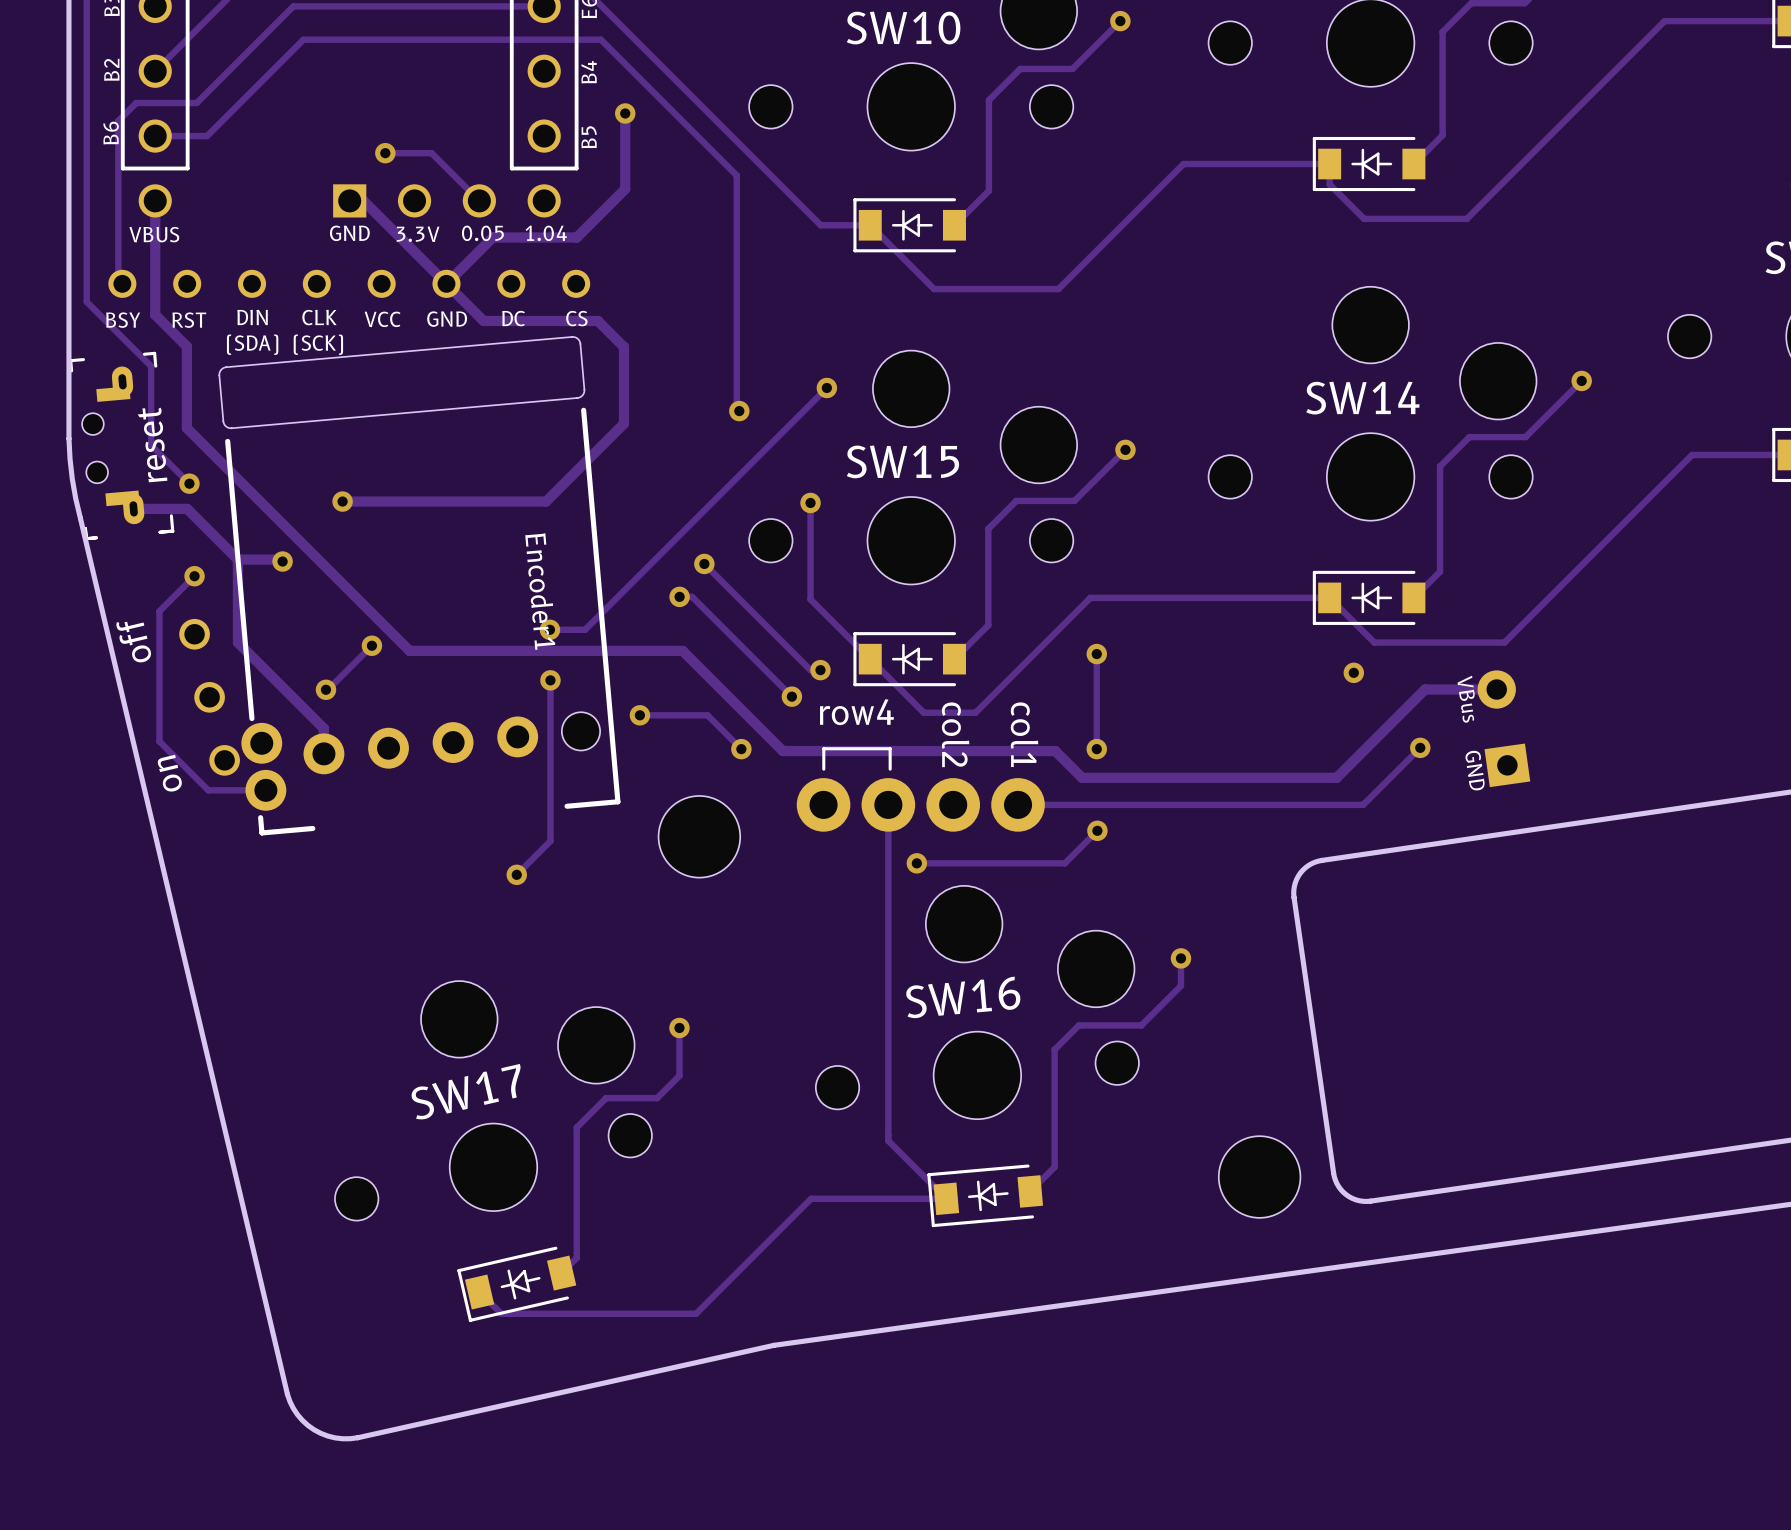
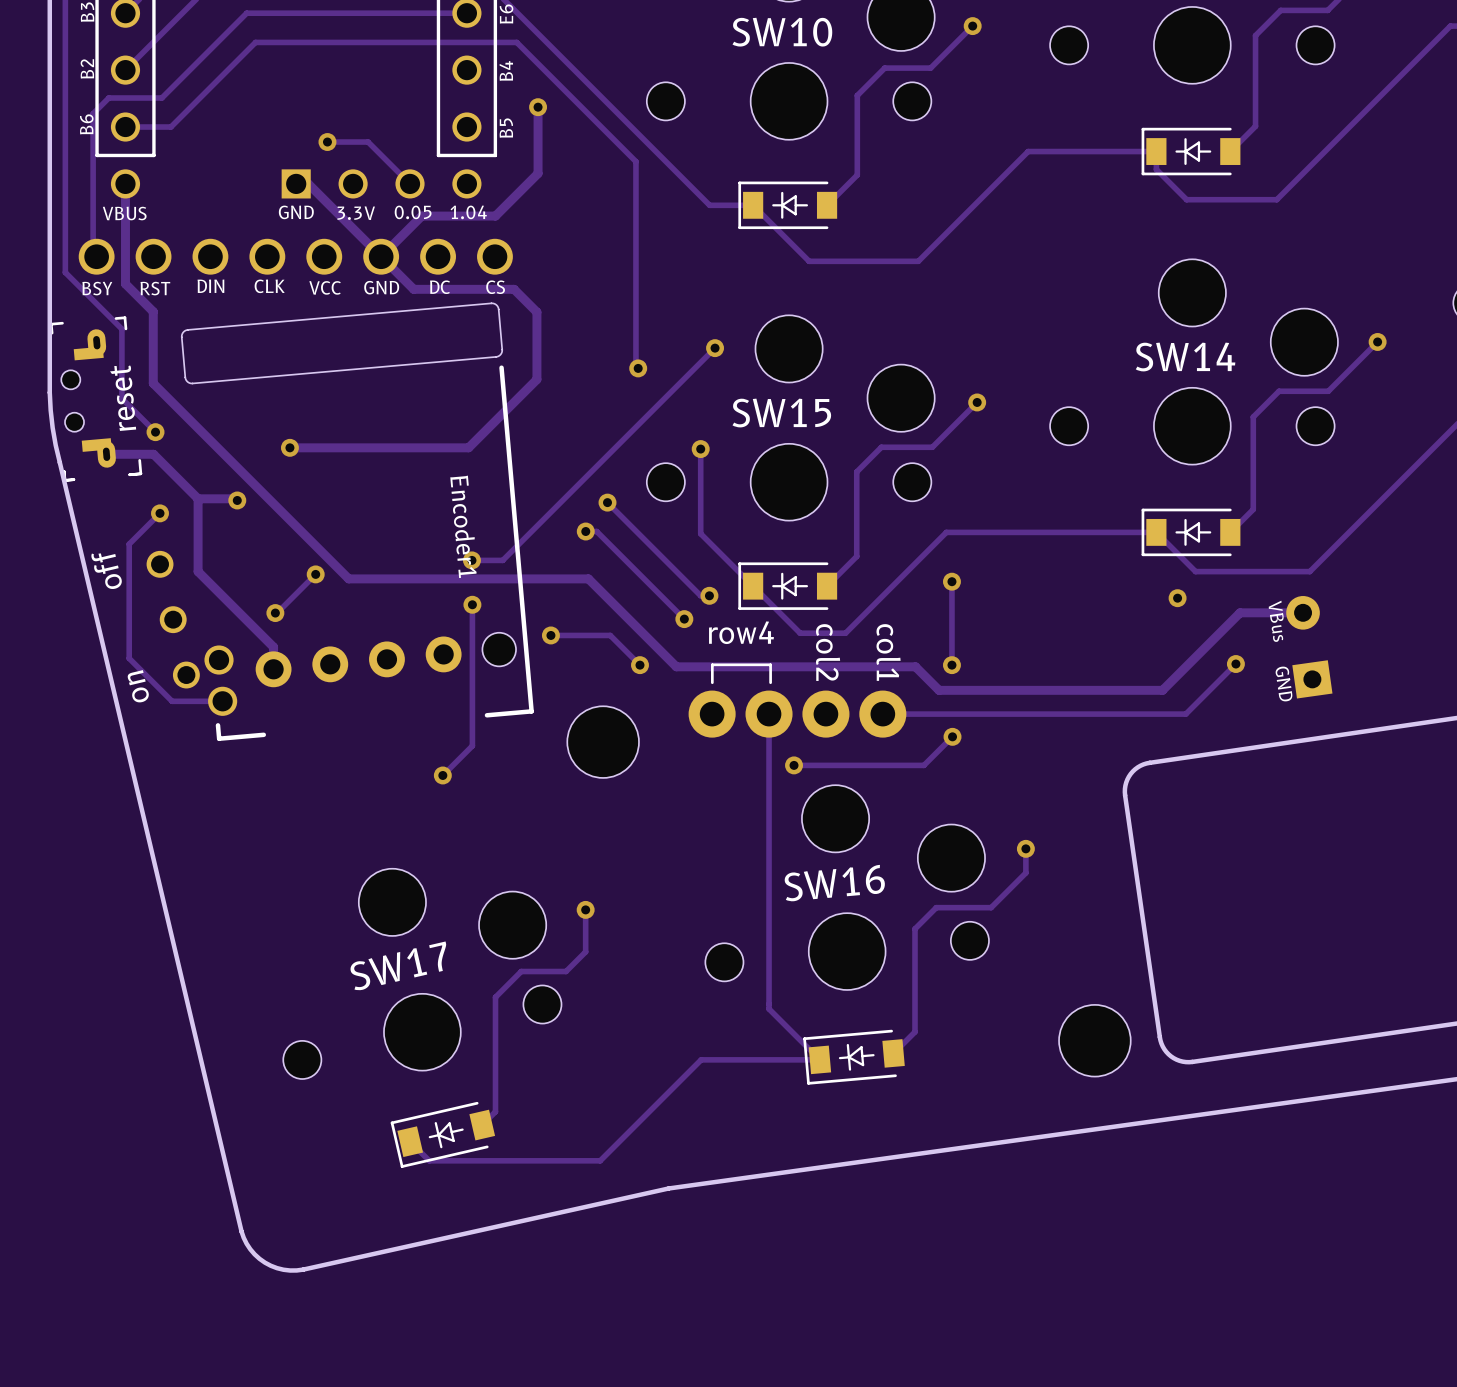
part footprint: [108, 269, 591, 298] -> [78, 238, 513, 275]
Encoder1 footprint: [218, 336, 621, 836] -> [181, 302, 534, 741]

